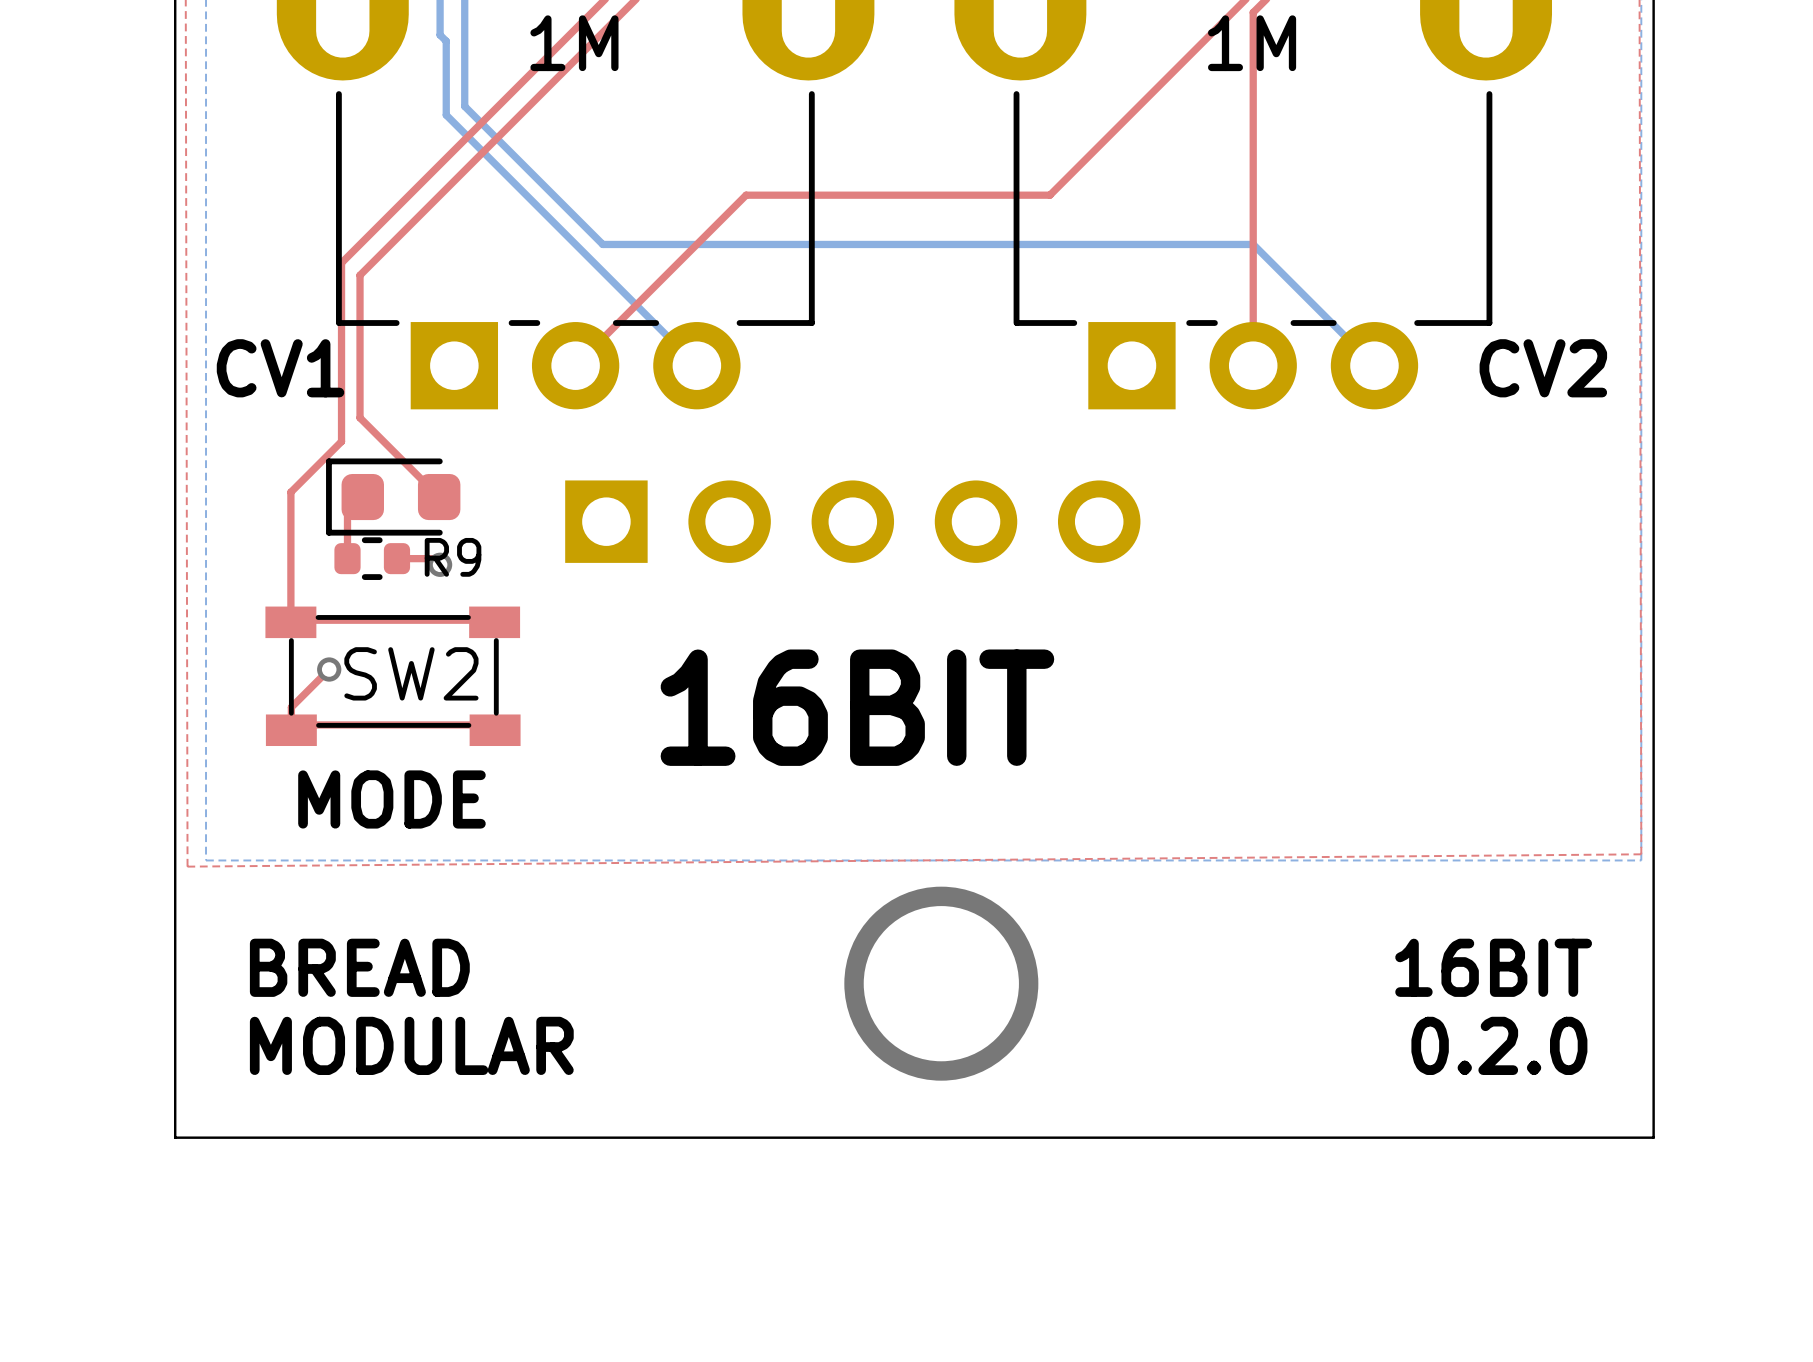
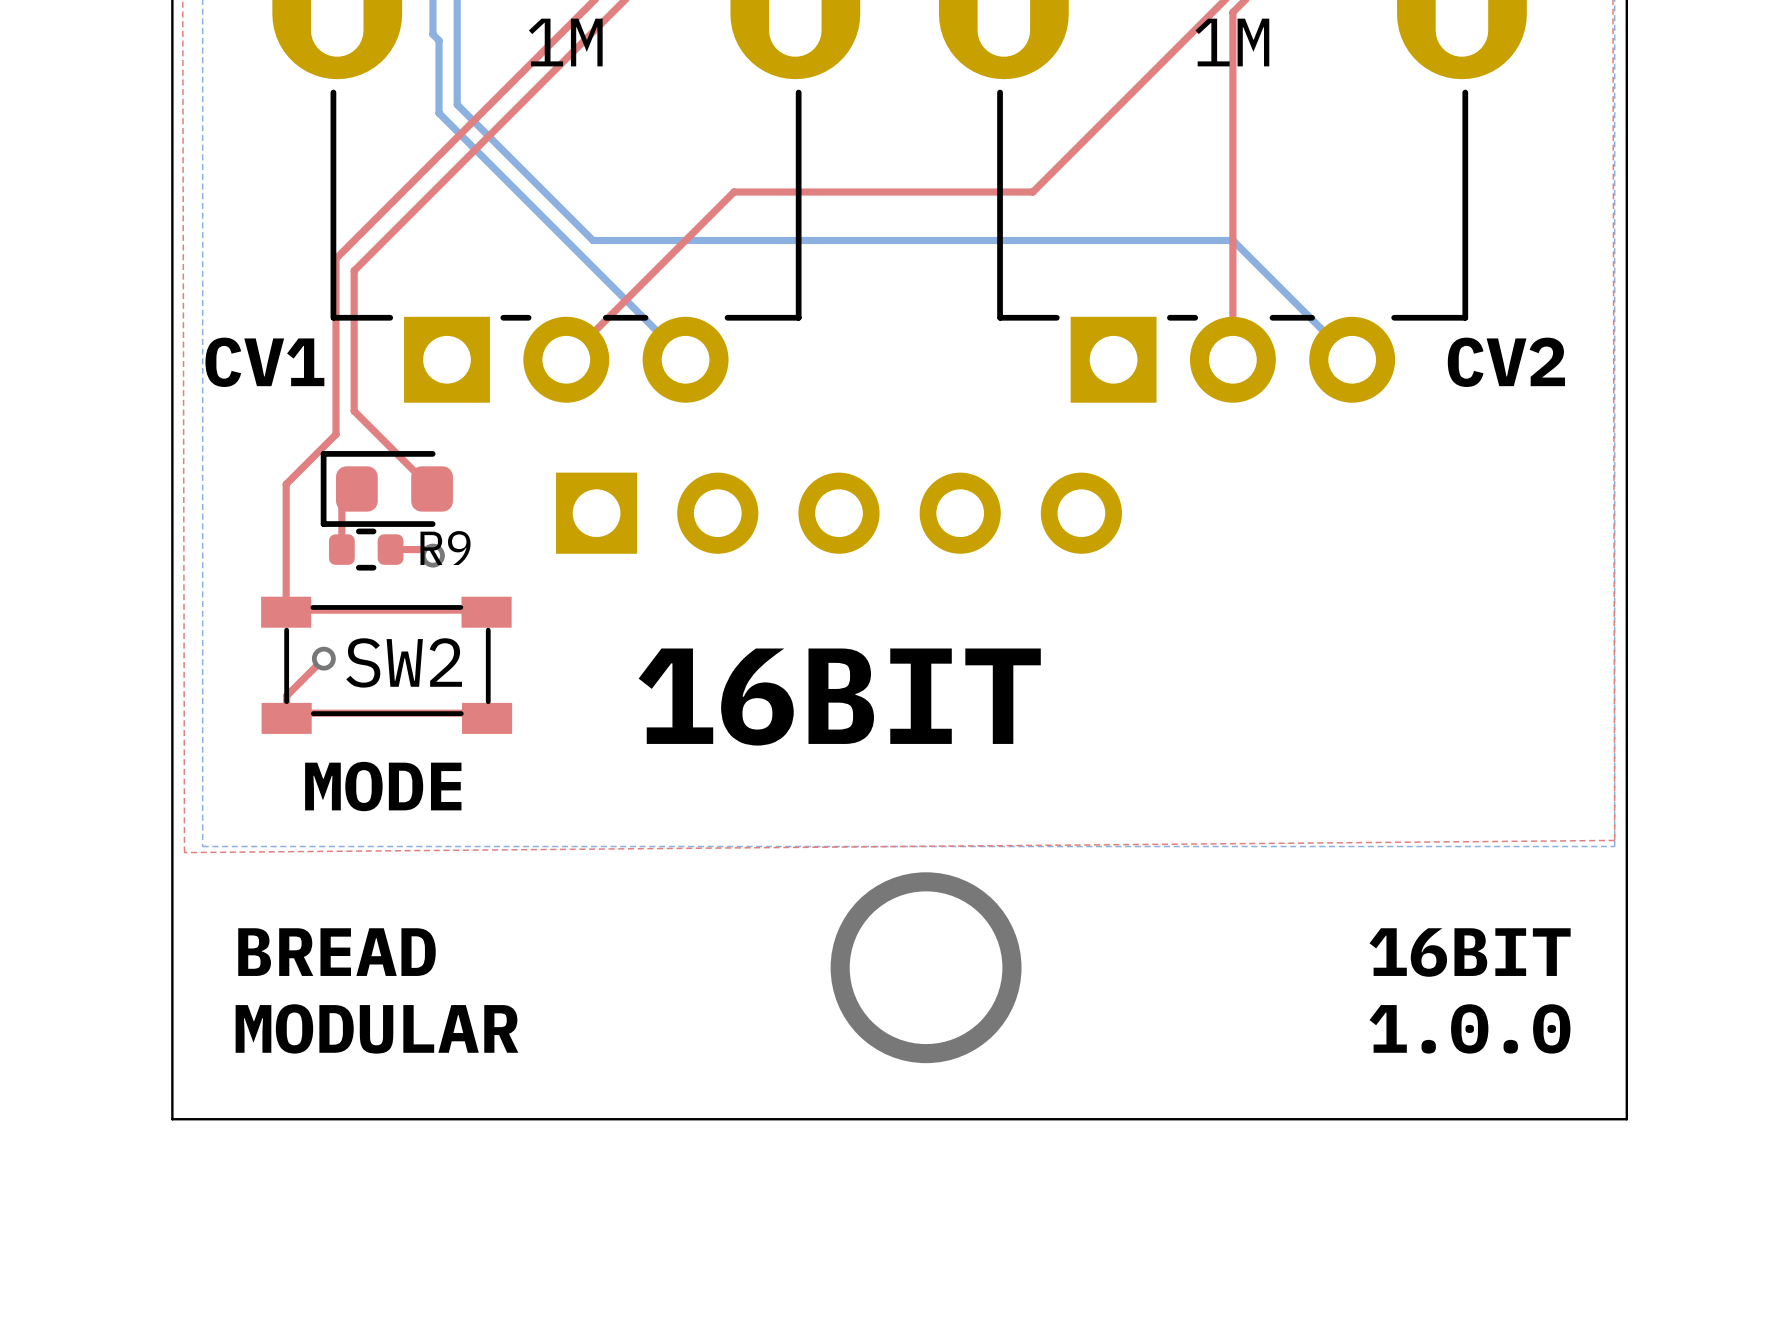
text: 0.2.0 (1499, 1045) -> 1.0.0 (1469, 1028)

